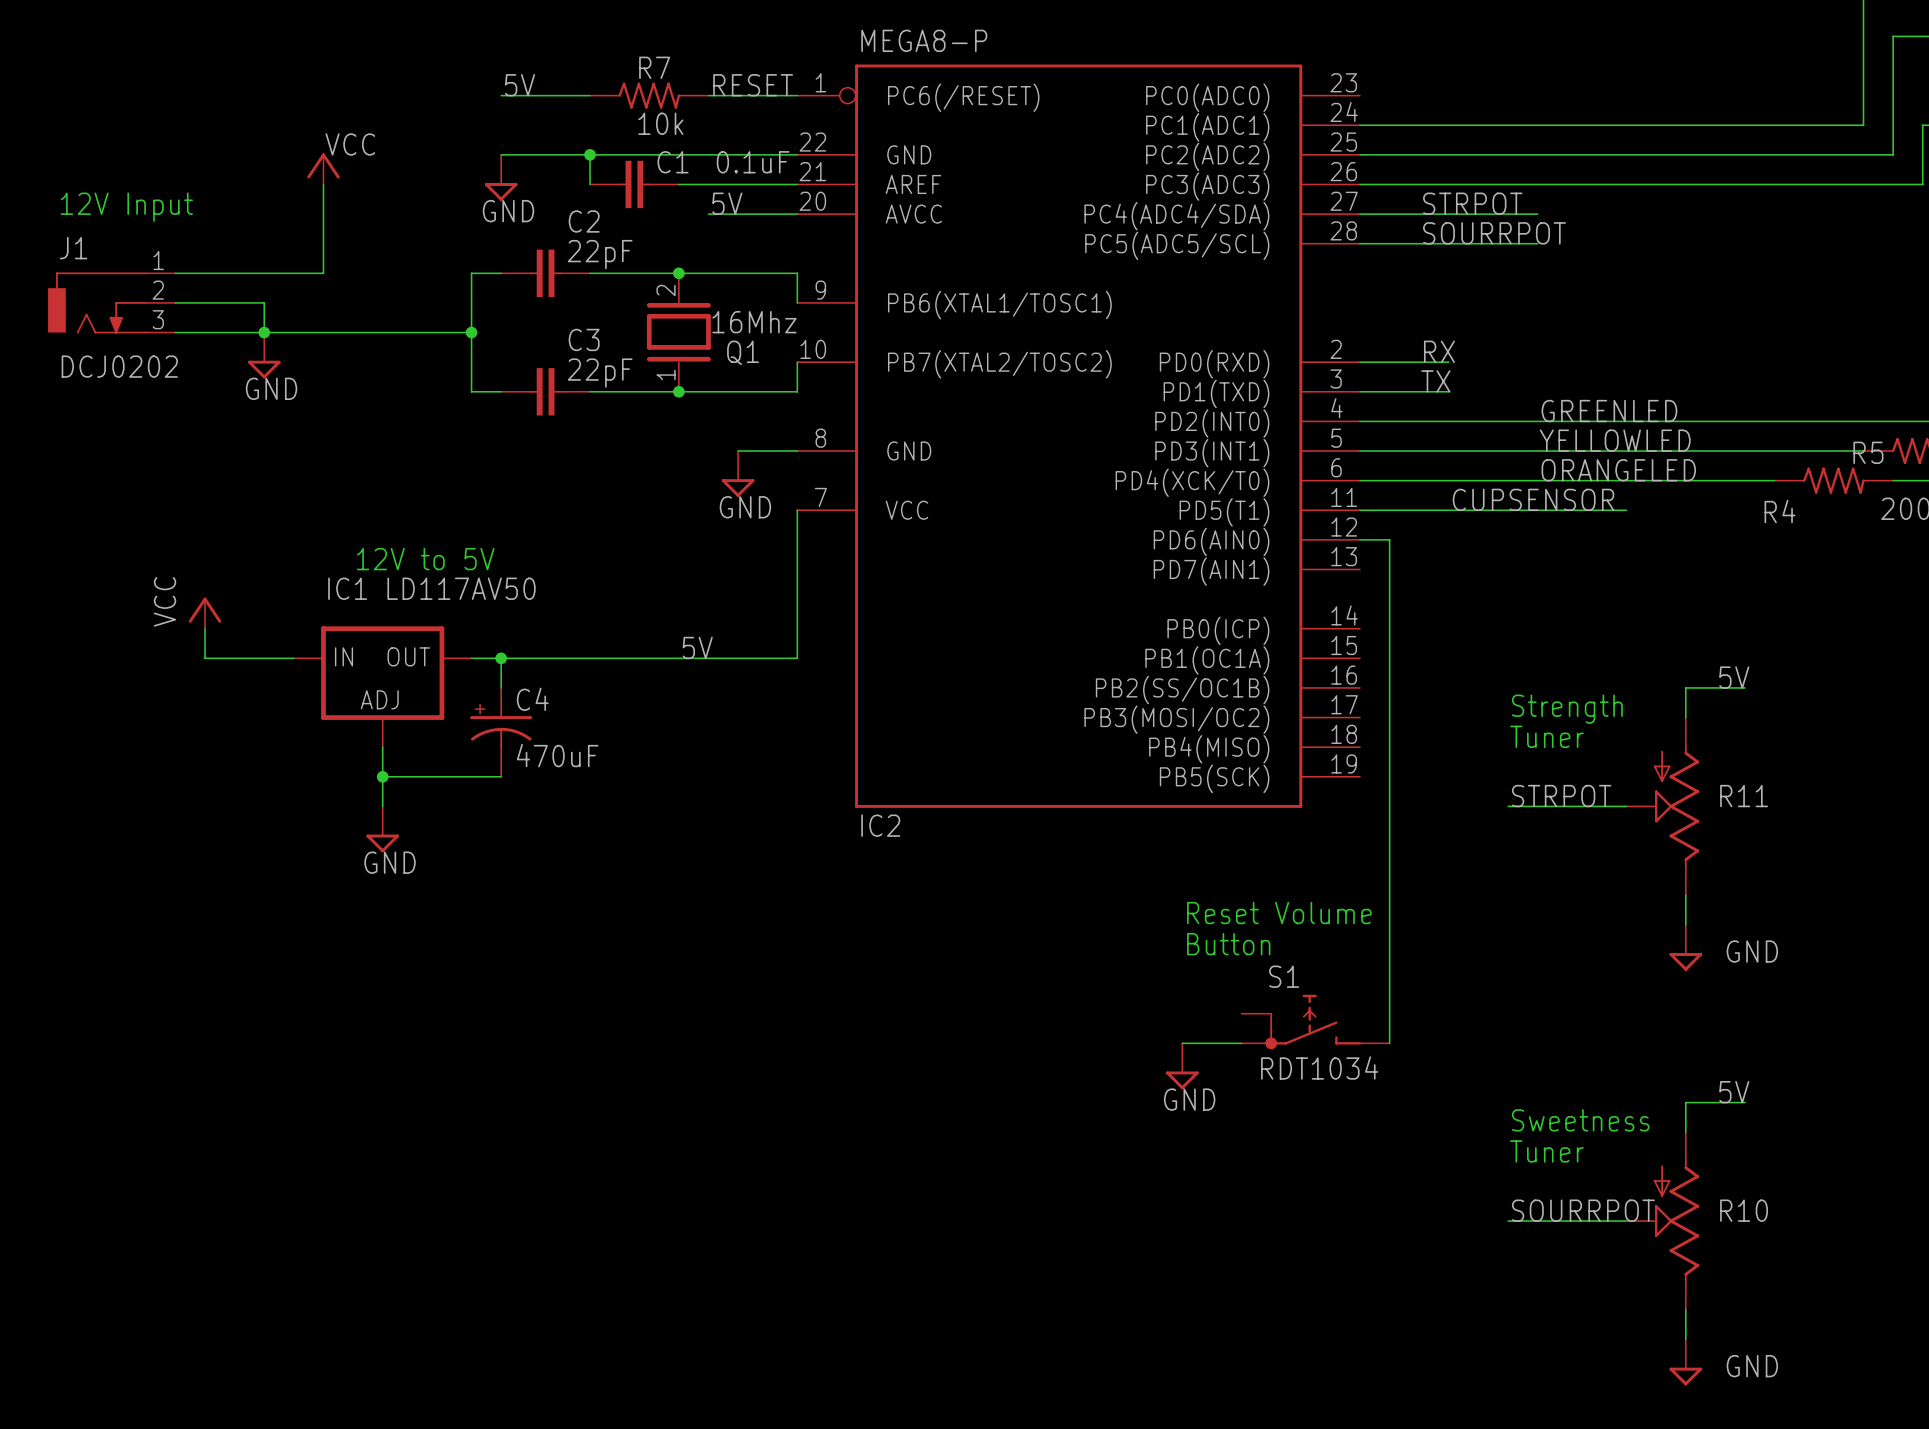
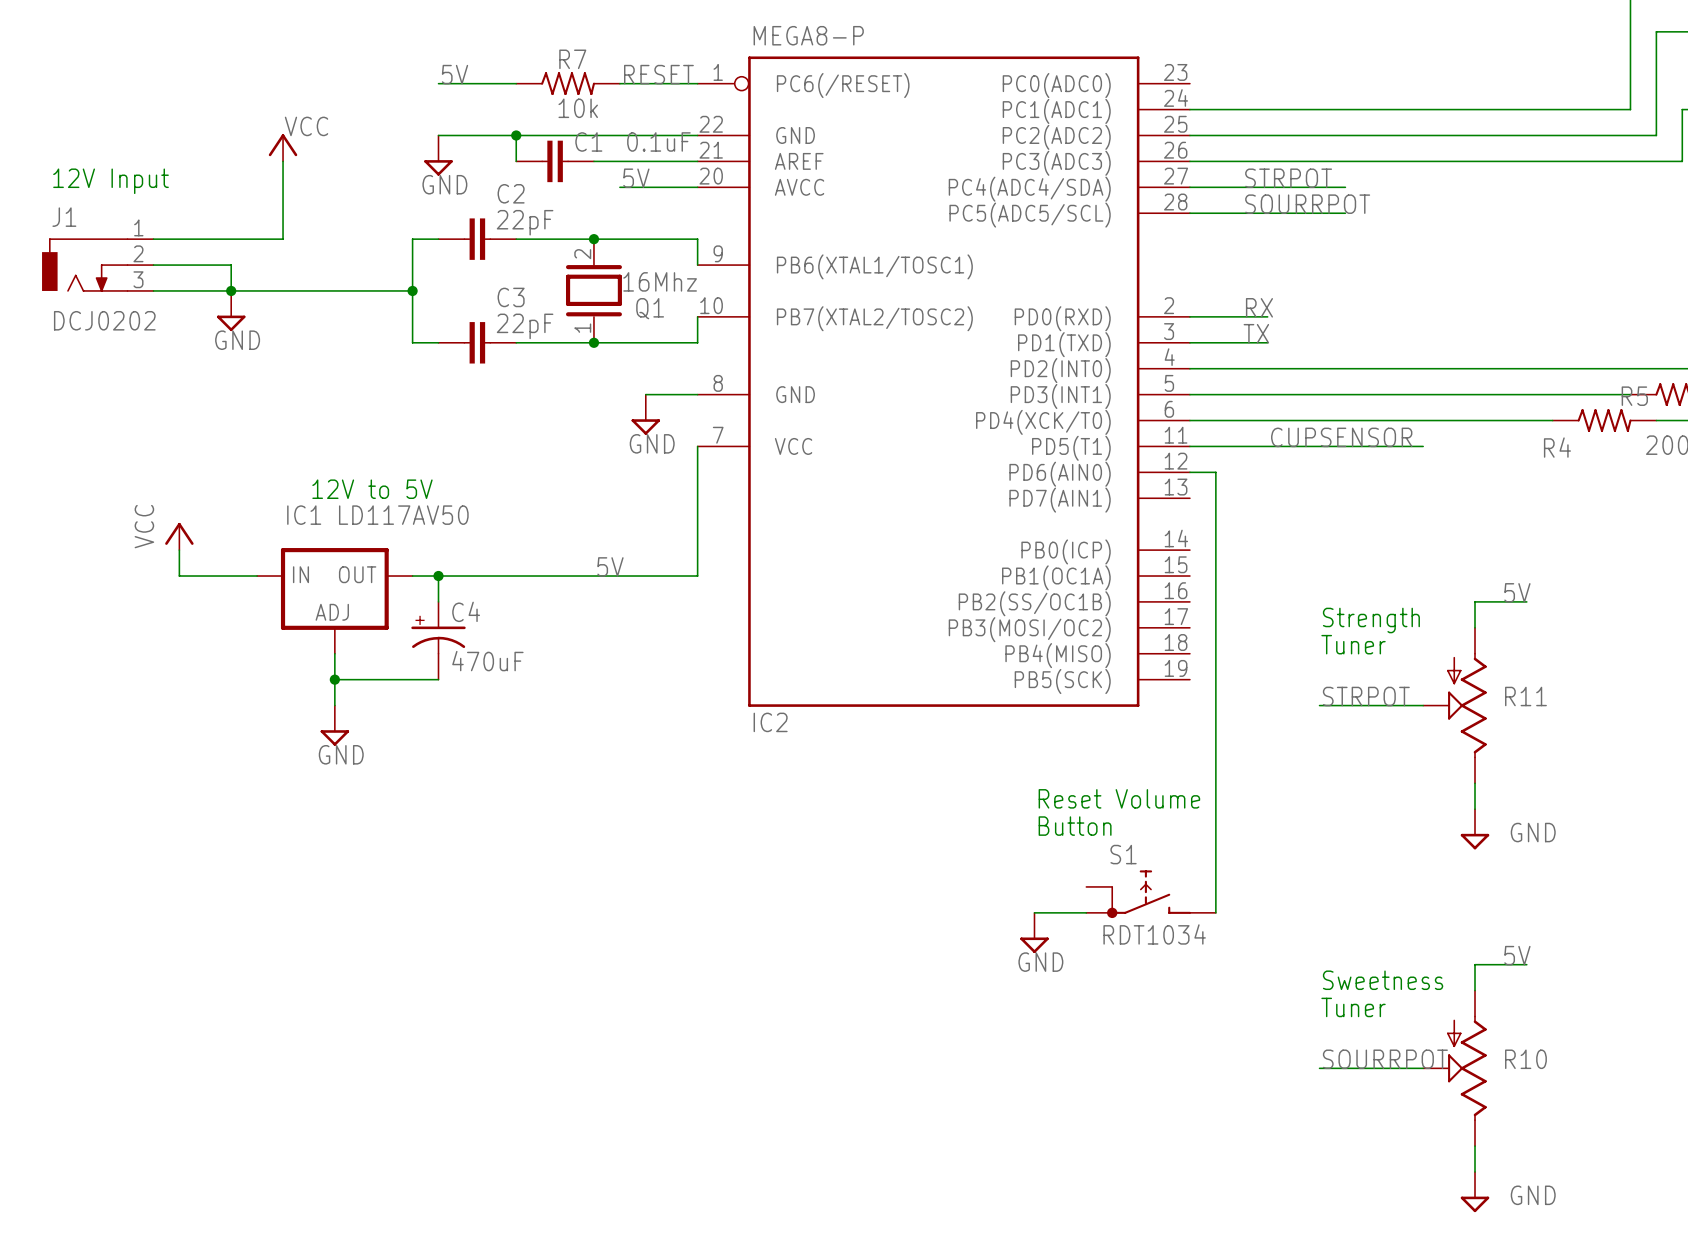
label: GREENLED (1609, 411) -> none
label: YELLOWLED (1615, 440) -> none
label: ORANGELED (1618, 470) -> none

